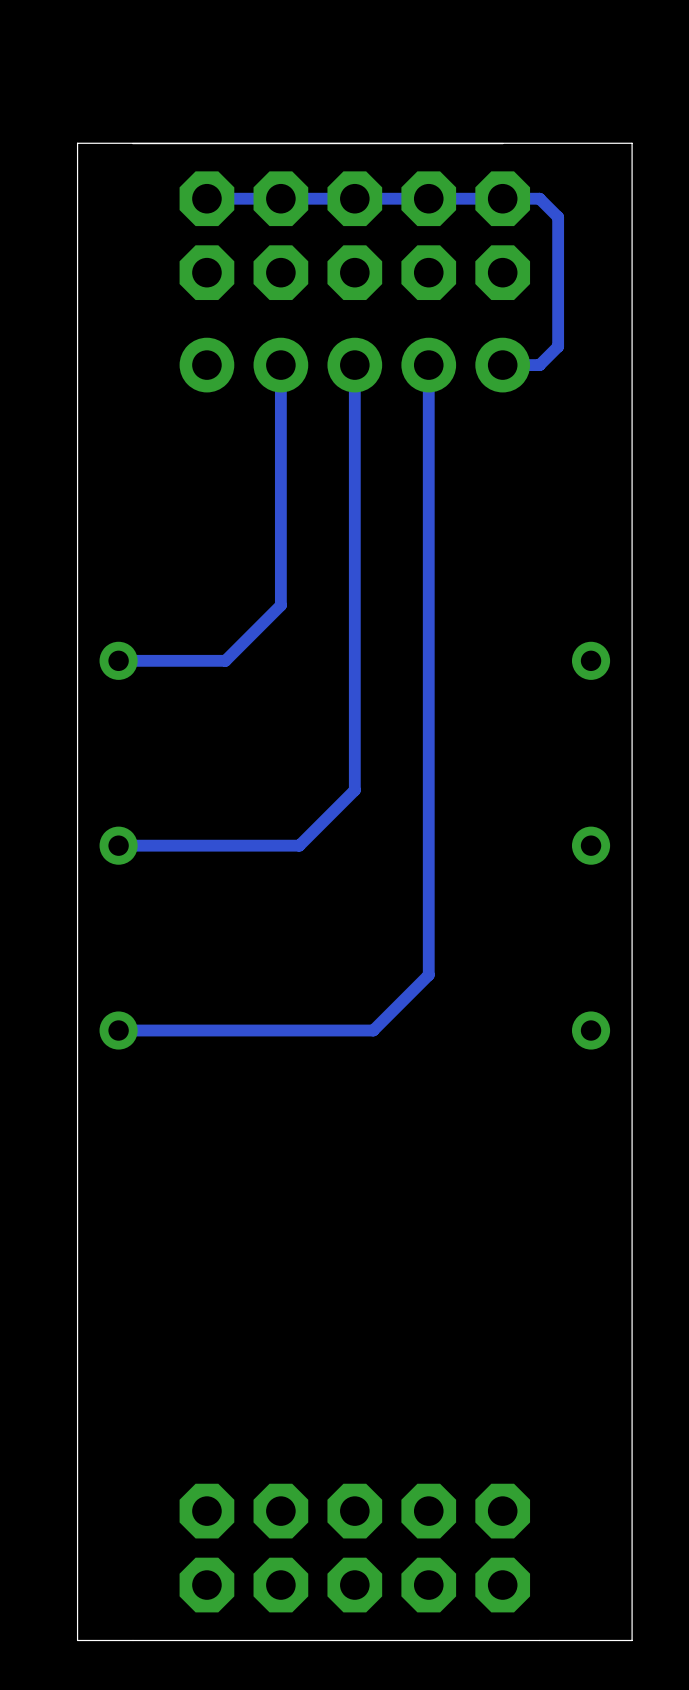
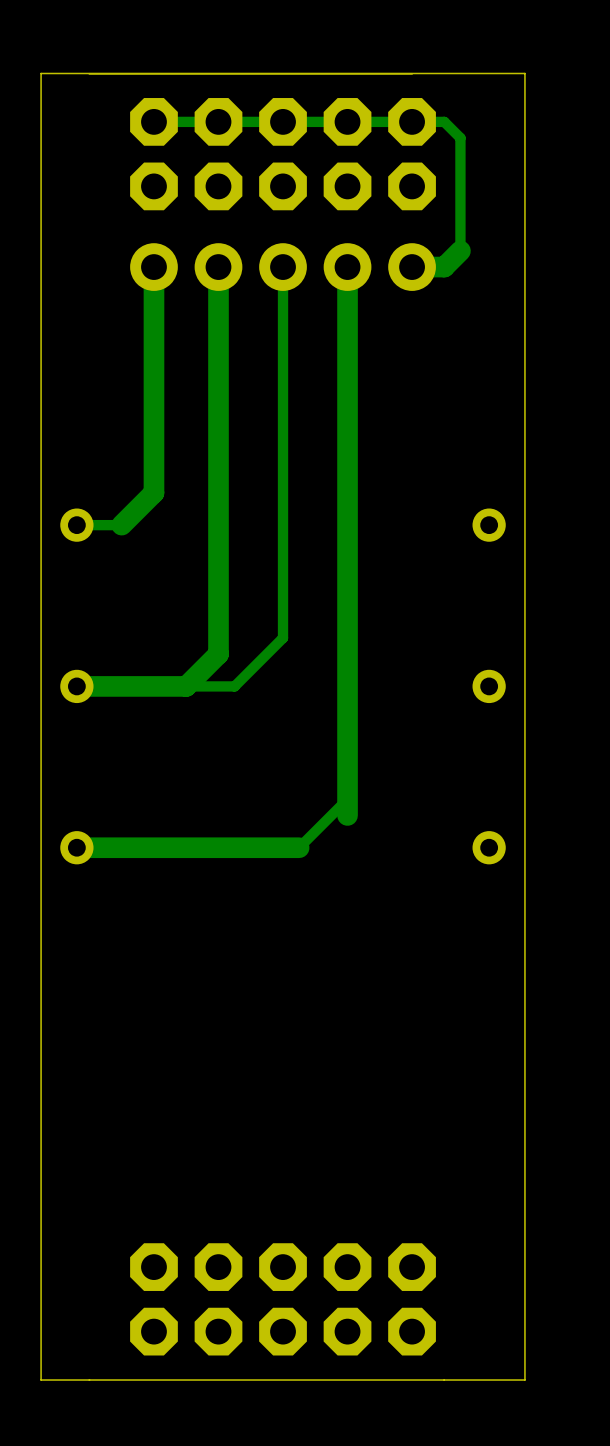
bottom track width: thin (558, 346) (539, 365) (502, 365) -> thick (460, 250) (444, 267) (412, 267)
bottom track: none -> (153, 267) (153, 492) (121, 525)
bottom track width: thin (280, 365) (280, 605) -> thick (218, 267) (218, 476)
bottom track width: thin (428, 365) (428, 975) -> thick (347, 267) (347, 799)
bottom track: (280, 605) (225, 660) (169, 660) -> (218, 476) (218, 654) (186, 686)
bottom track width: thin (243, 845) (118, 845) -> thick (186, 686) (76, 686)
bottom track width: thin (373, 1030) (118, 1030) -> thick (299, 847) (76, 847)

